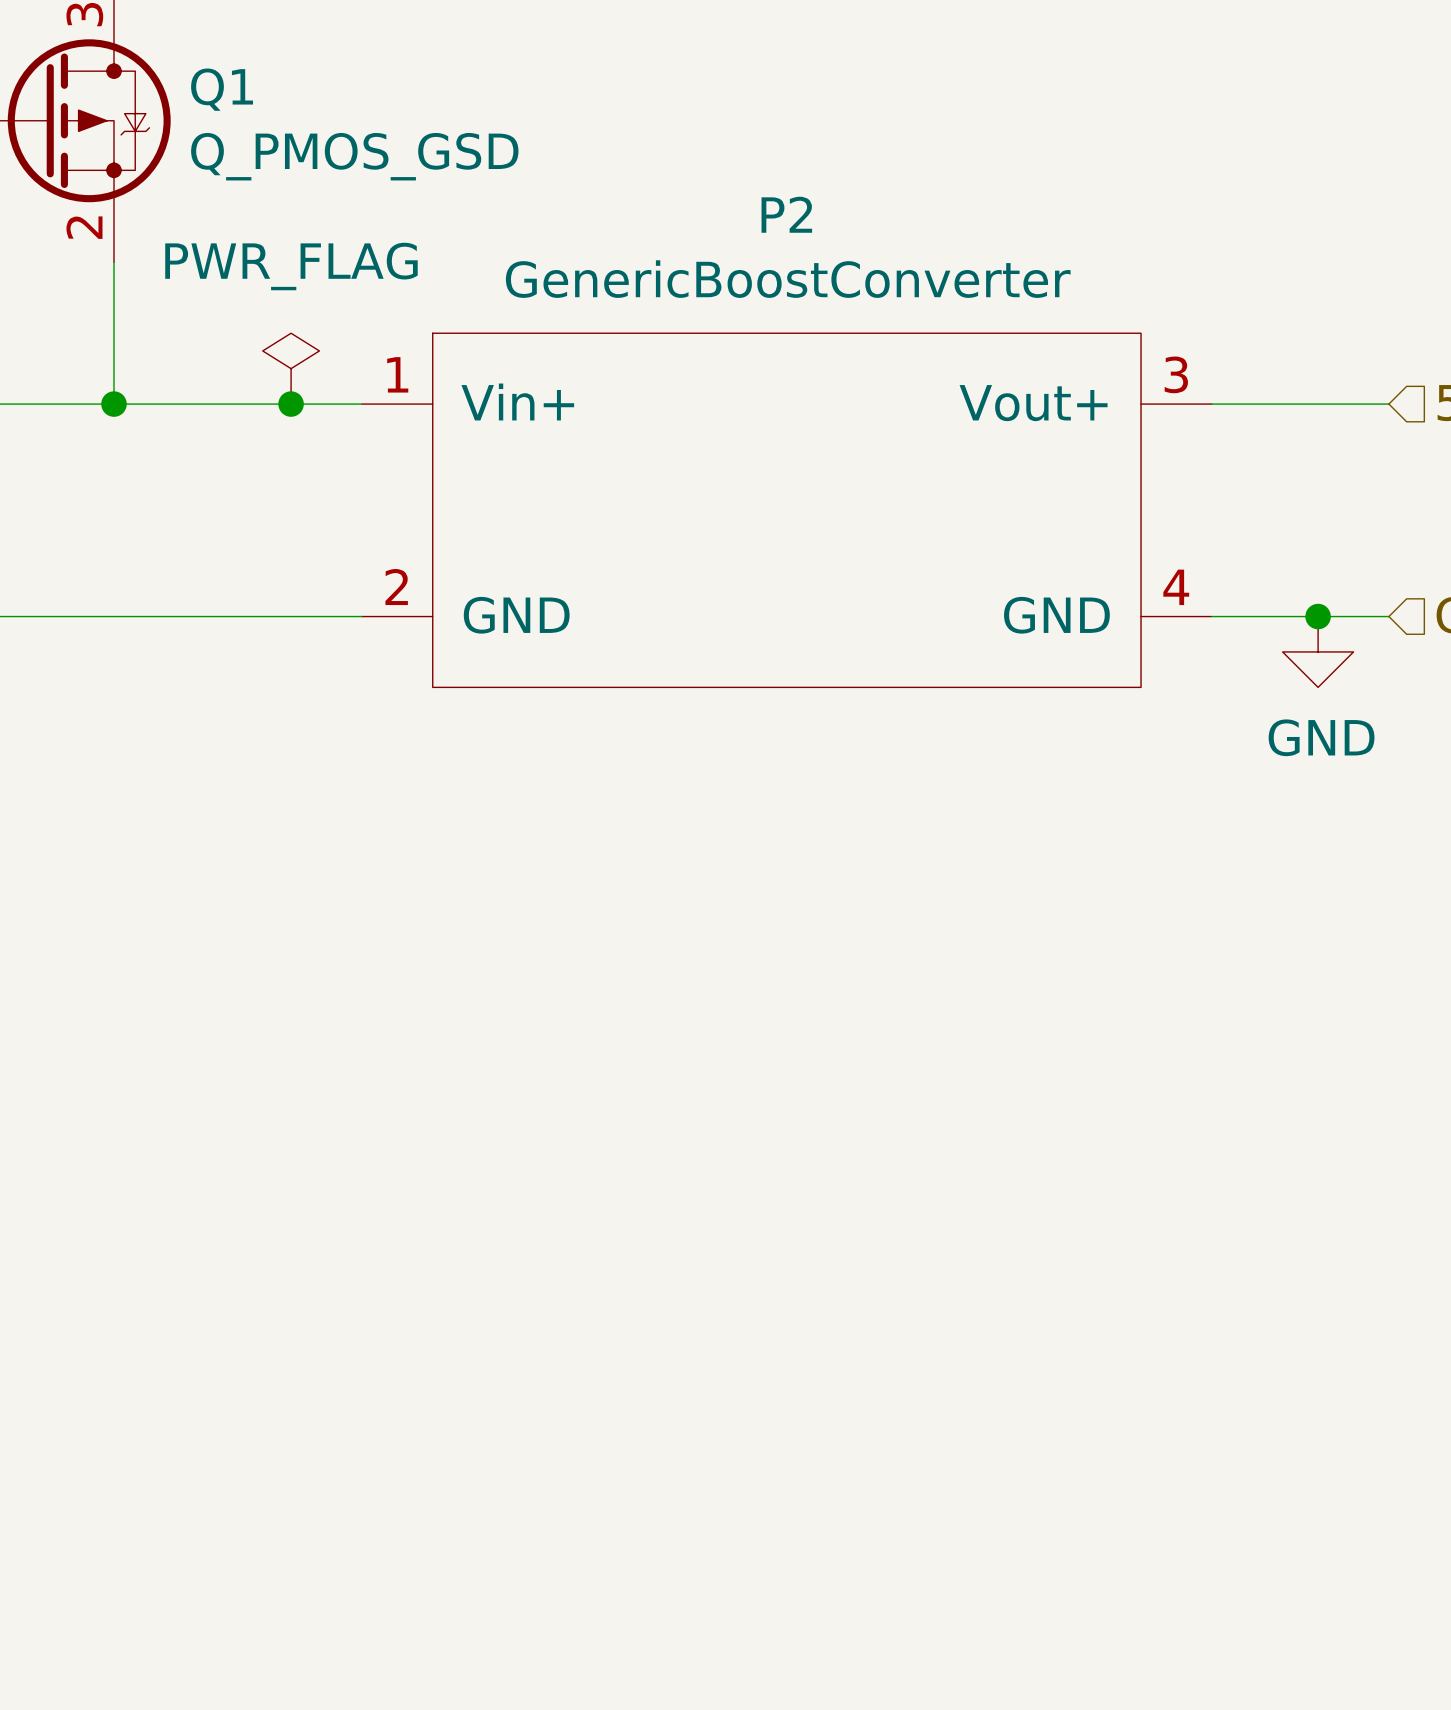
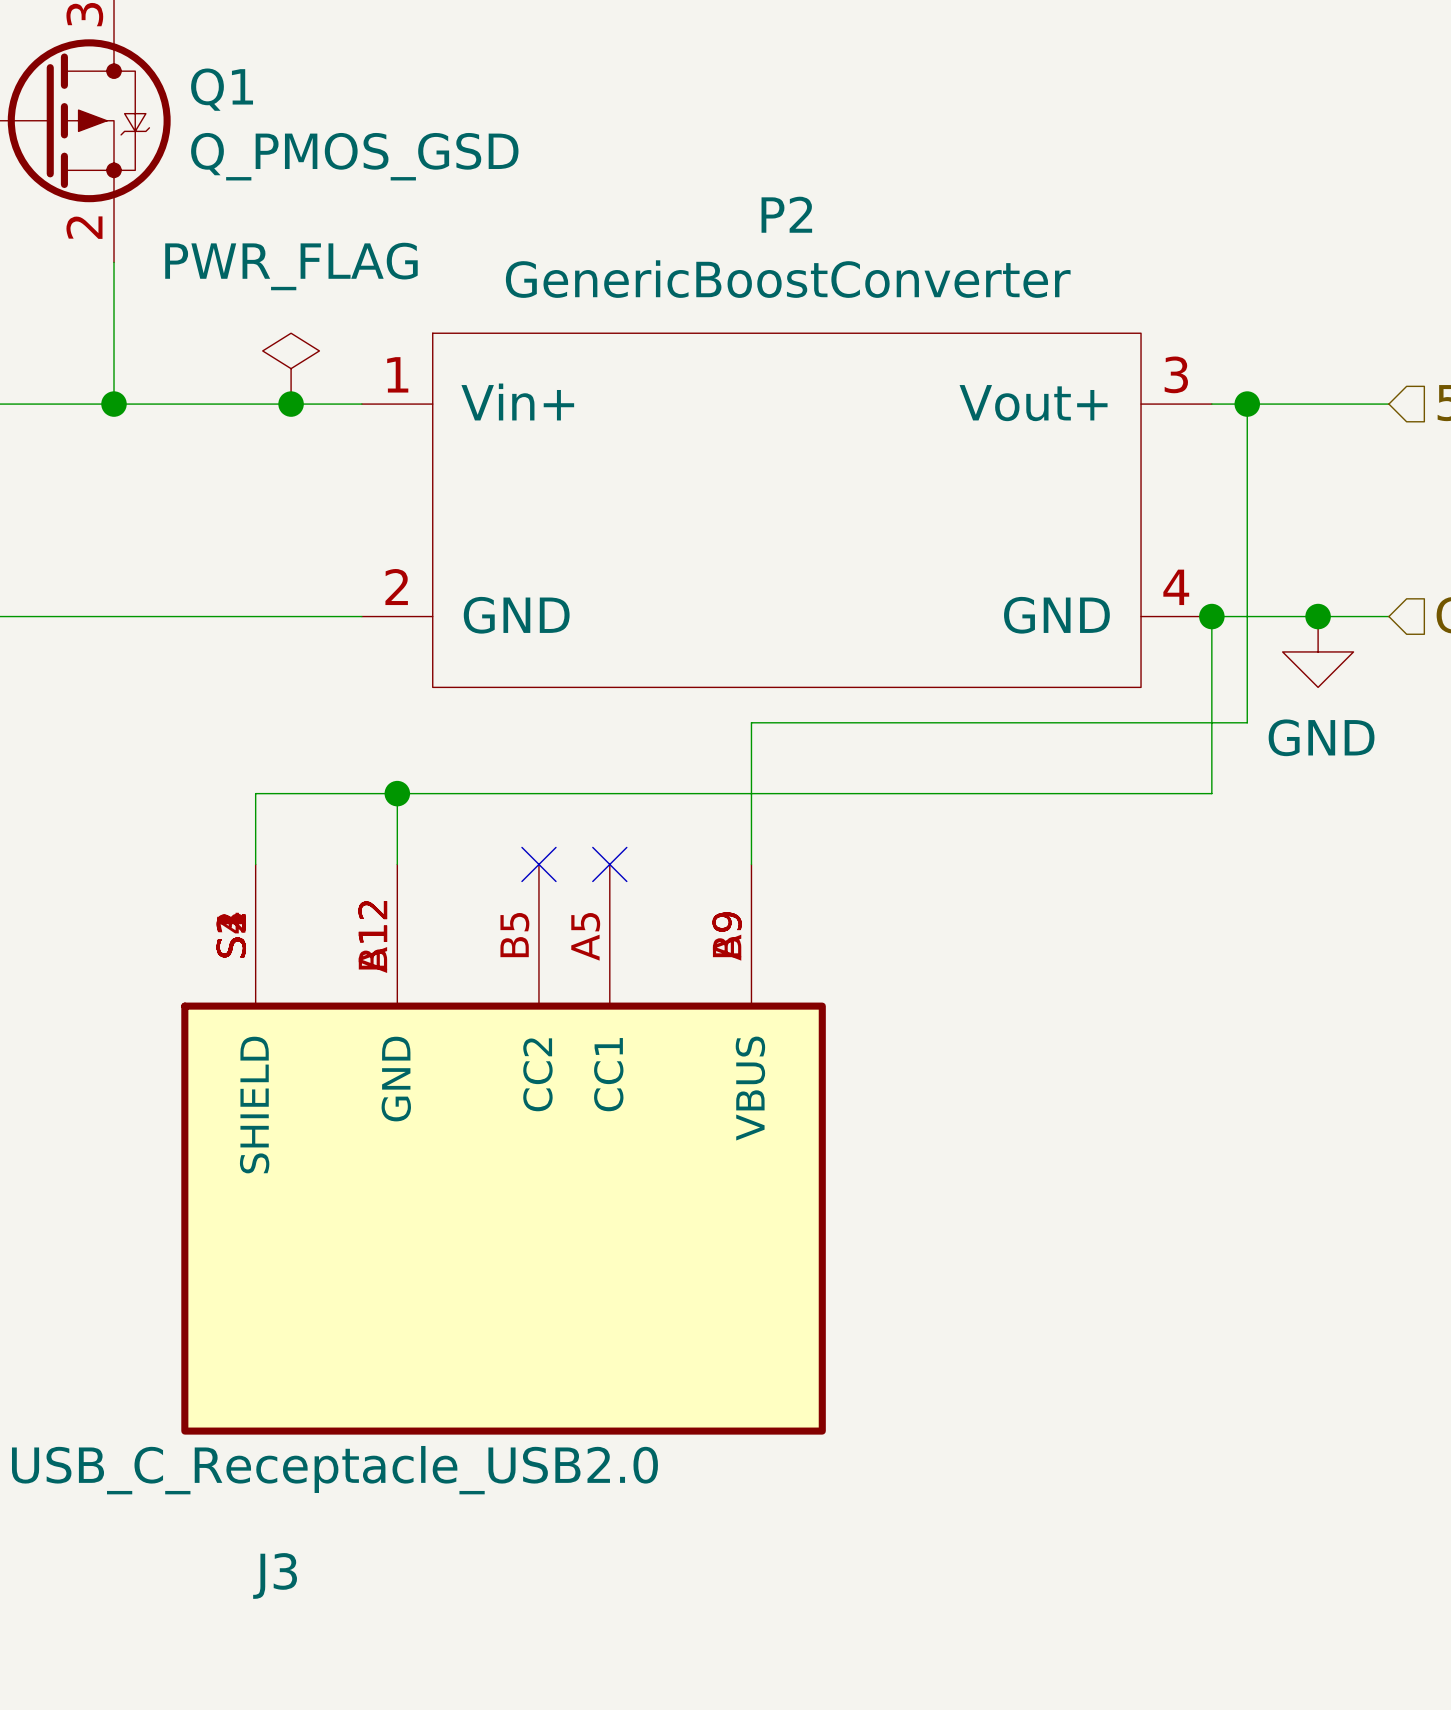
wire: none -> (1247, 404) (1247, 722) (751, 722) (751, 864)
junction: none -> (1247, 404)
wire: none -> (1211, 616) (1211, 793) (255, 793) (255, 864)
junction: none -> (1211, 616)
wire: none -> (397, 793) (397, 864)
junction: none -> (397, 793)
no-connect mark: none -> (538, 864)
no-connect mark: none -> (609, 864)
J3: none -> USB_C_Receptacle_USB2.0 (503, 1149)

